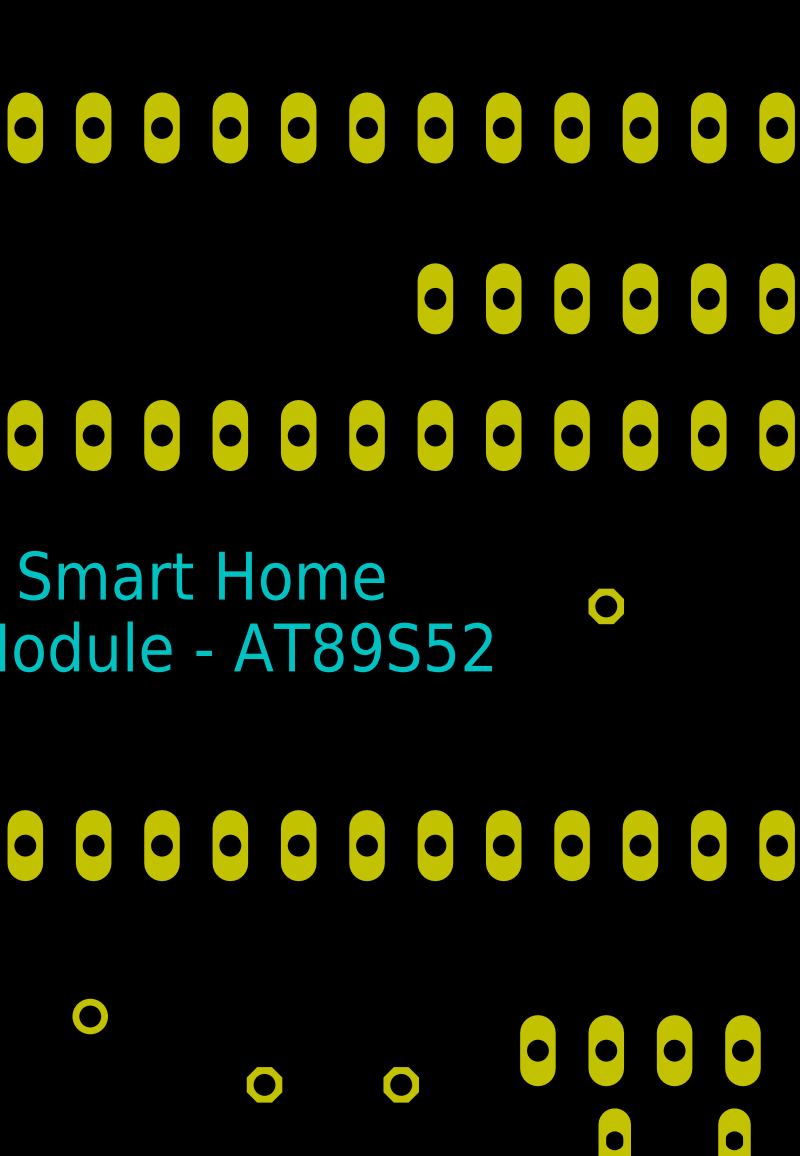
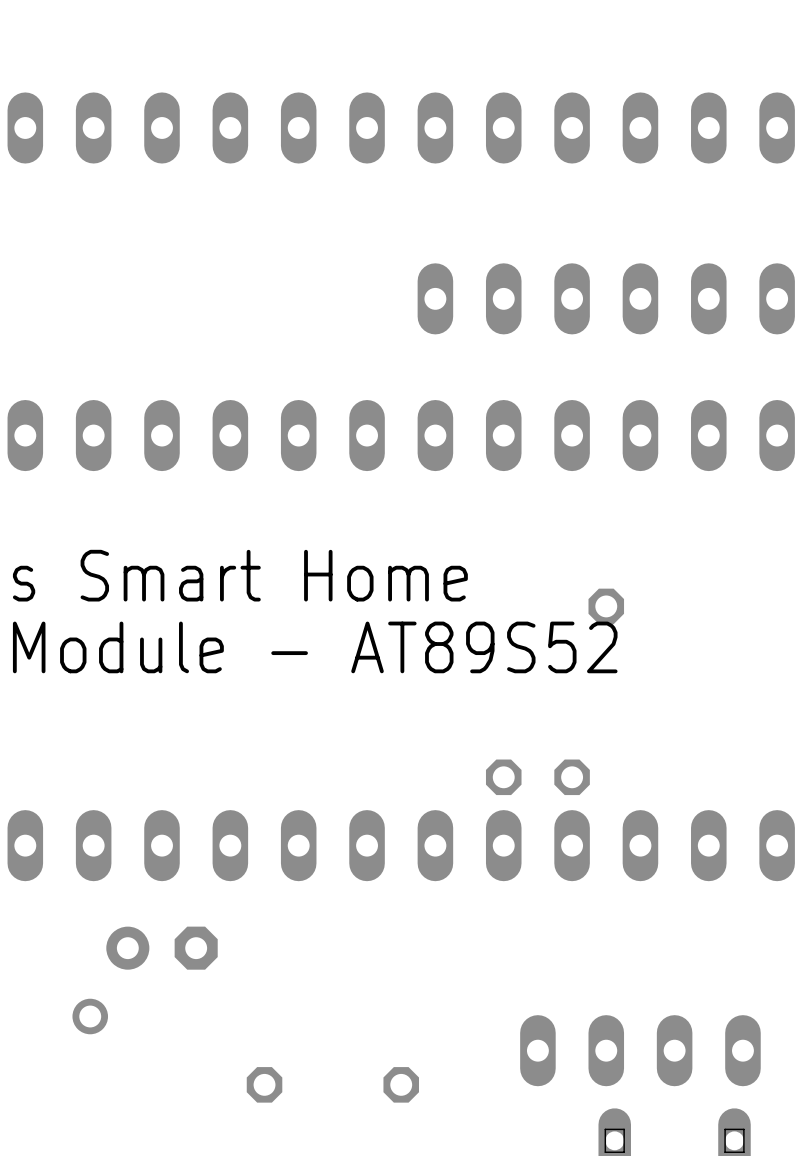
part: none -> (537, 777)
part: none -> (162, 948)

